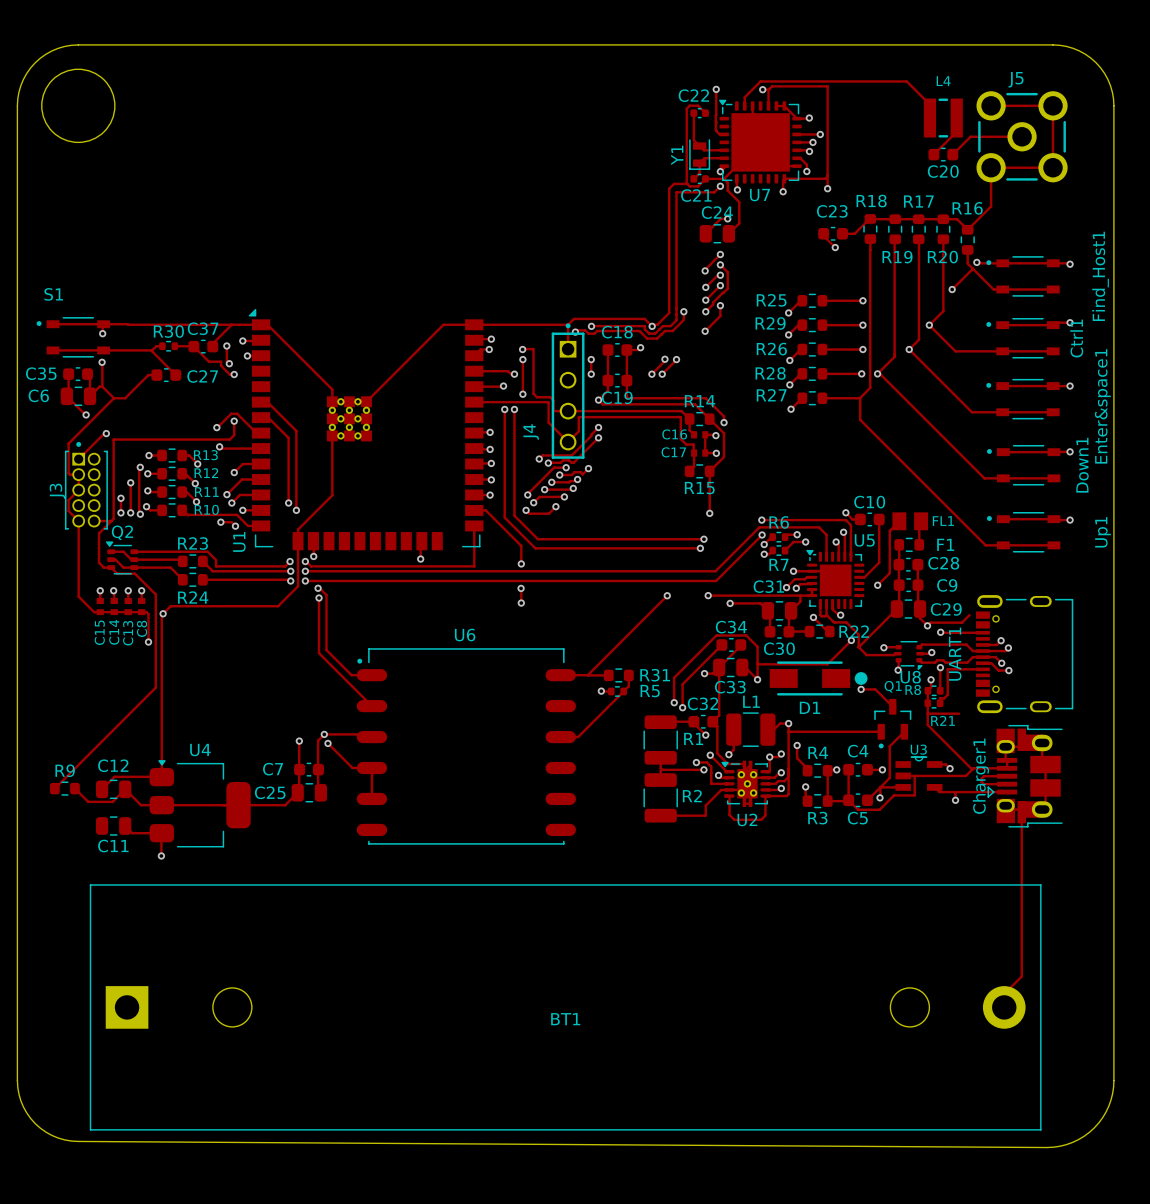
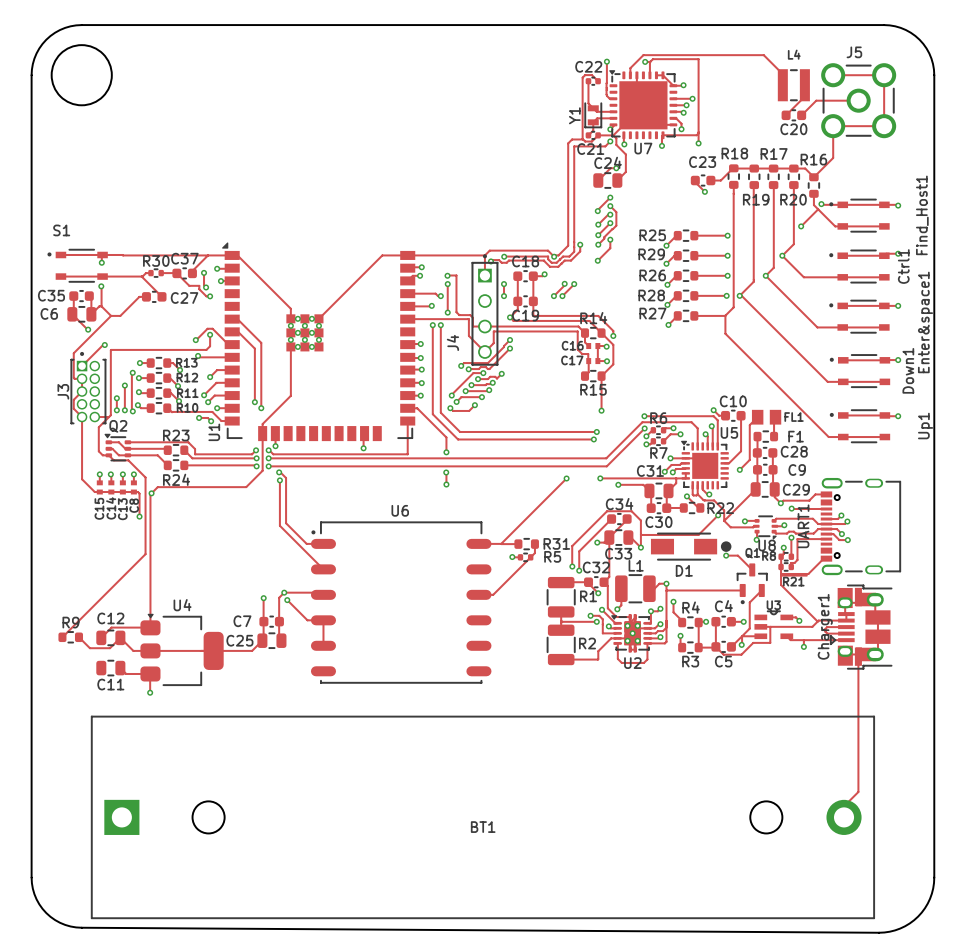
track: none -> (815, 494) (826, 494)
track: none -> (826, 558) (823, 558) (808, 573) (781, 573)

